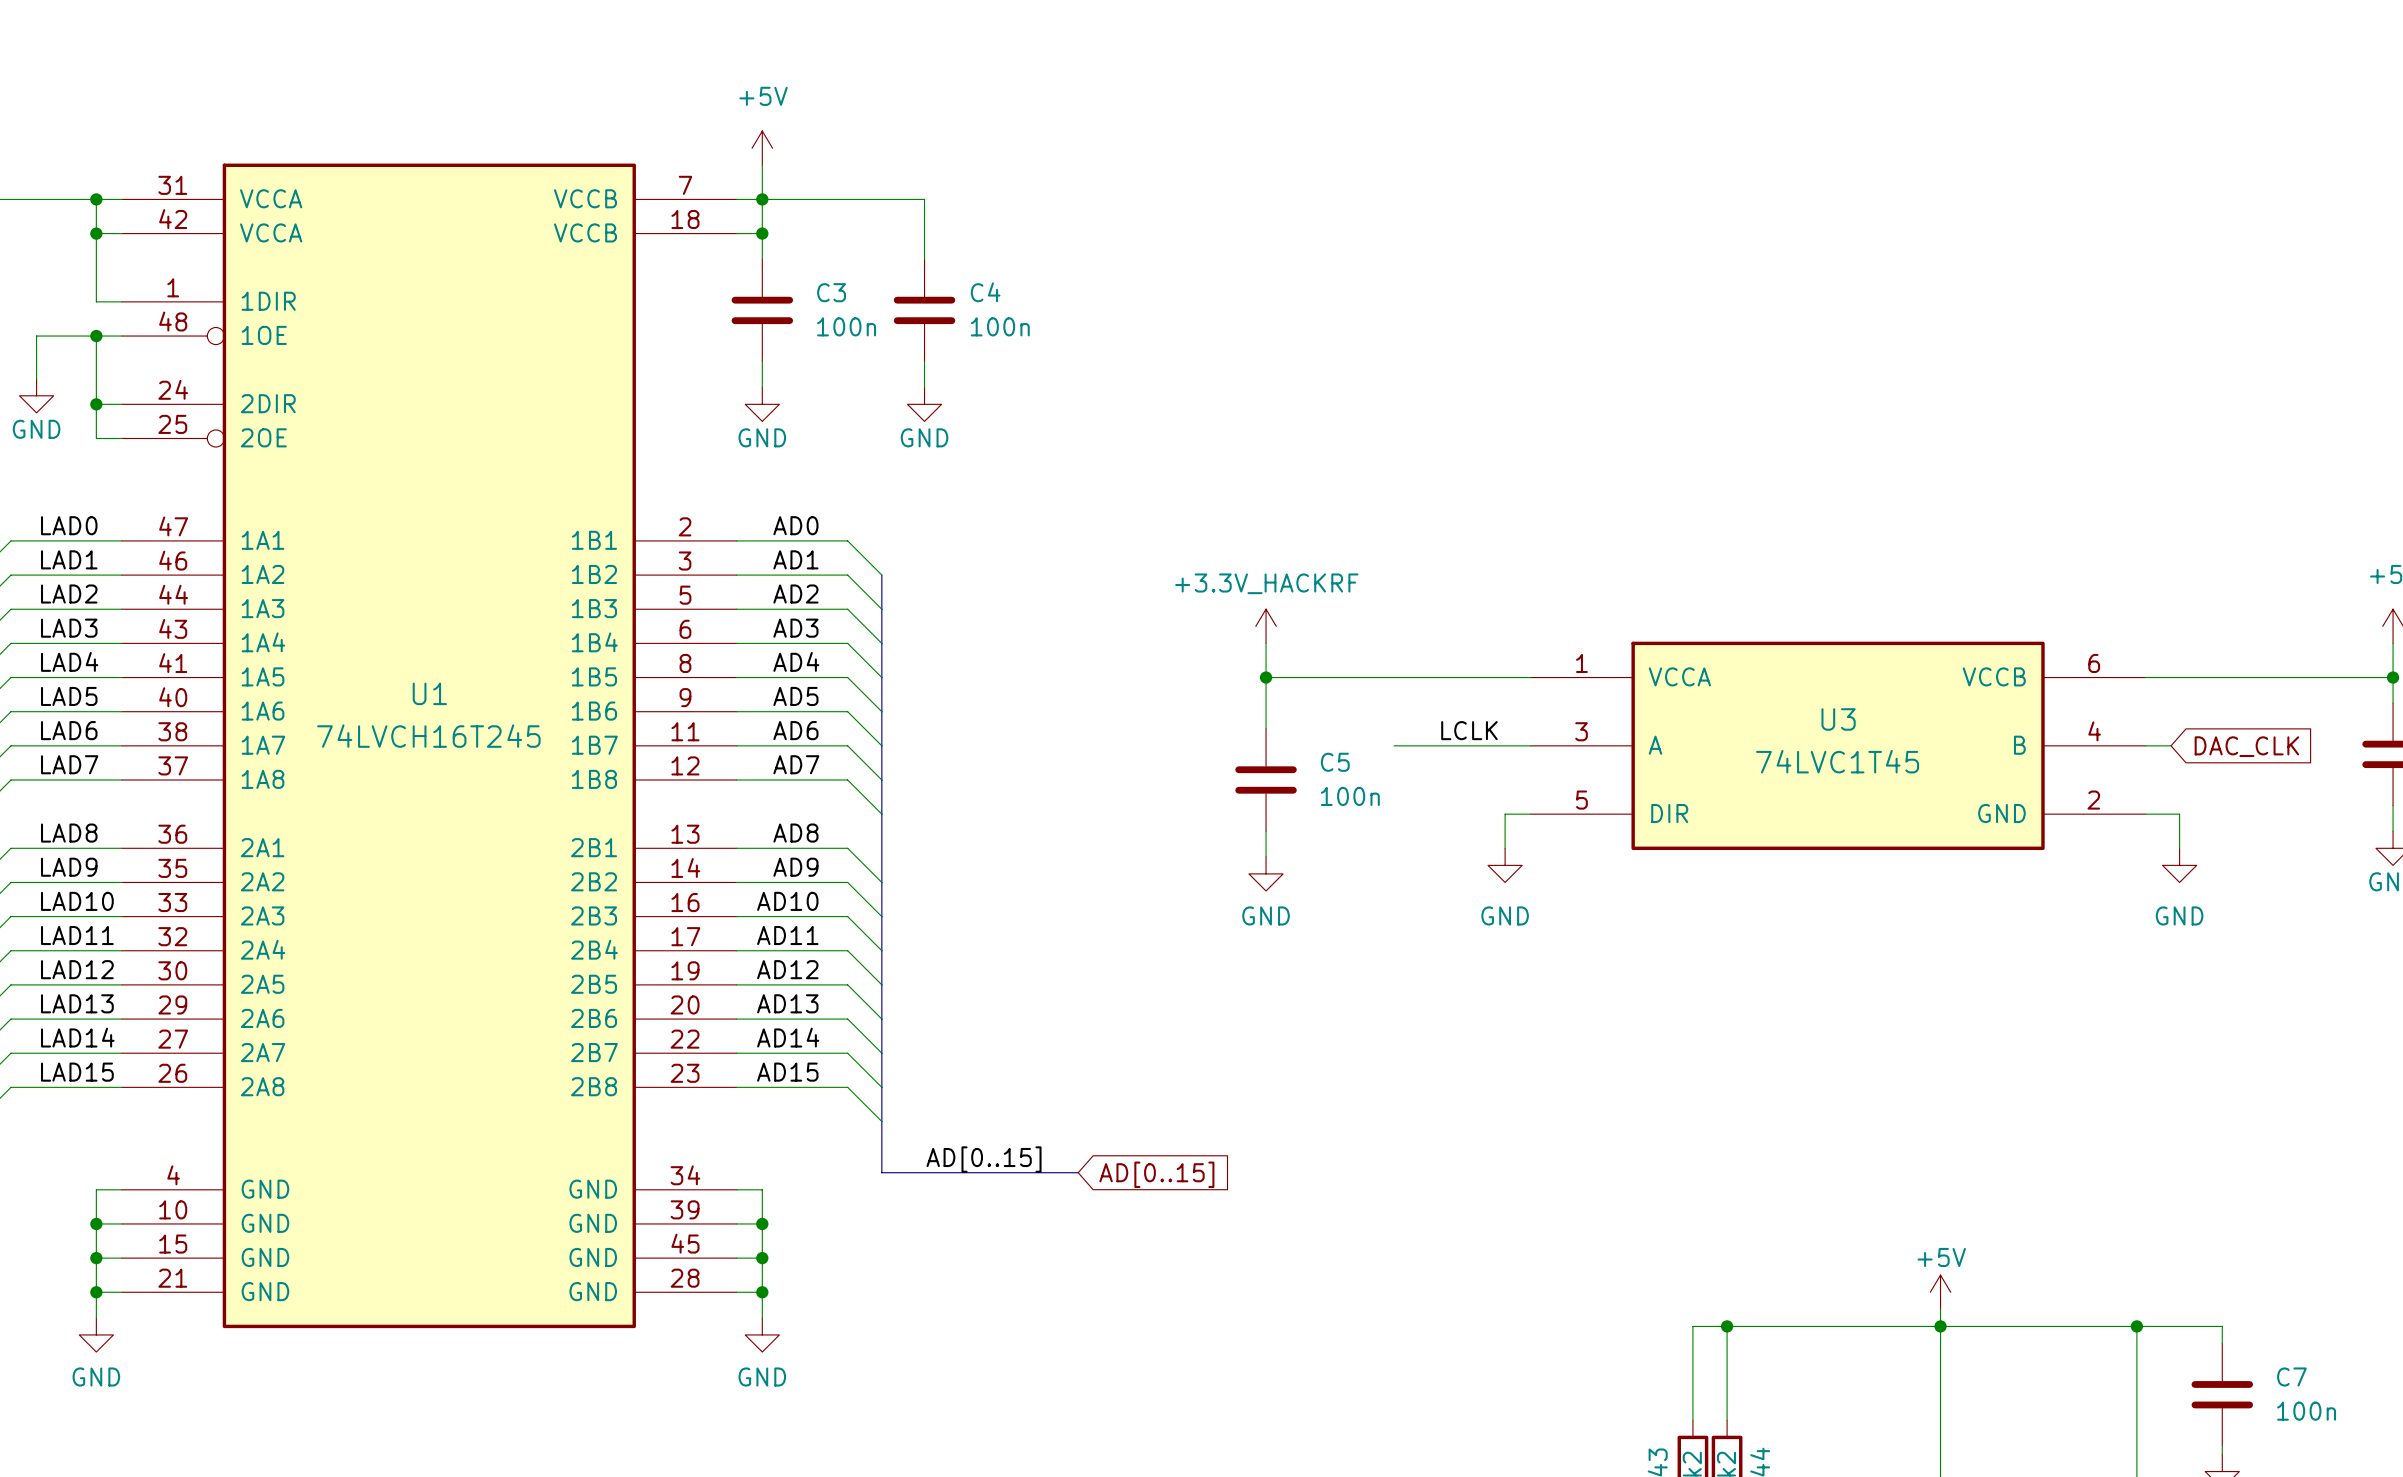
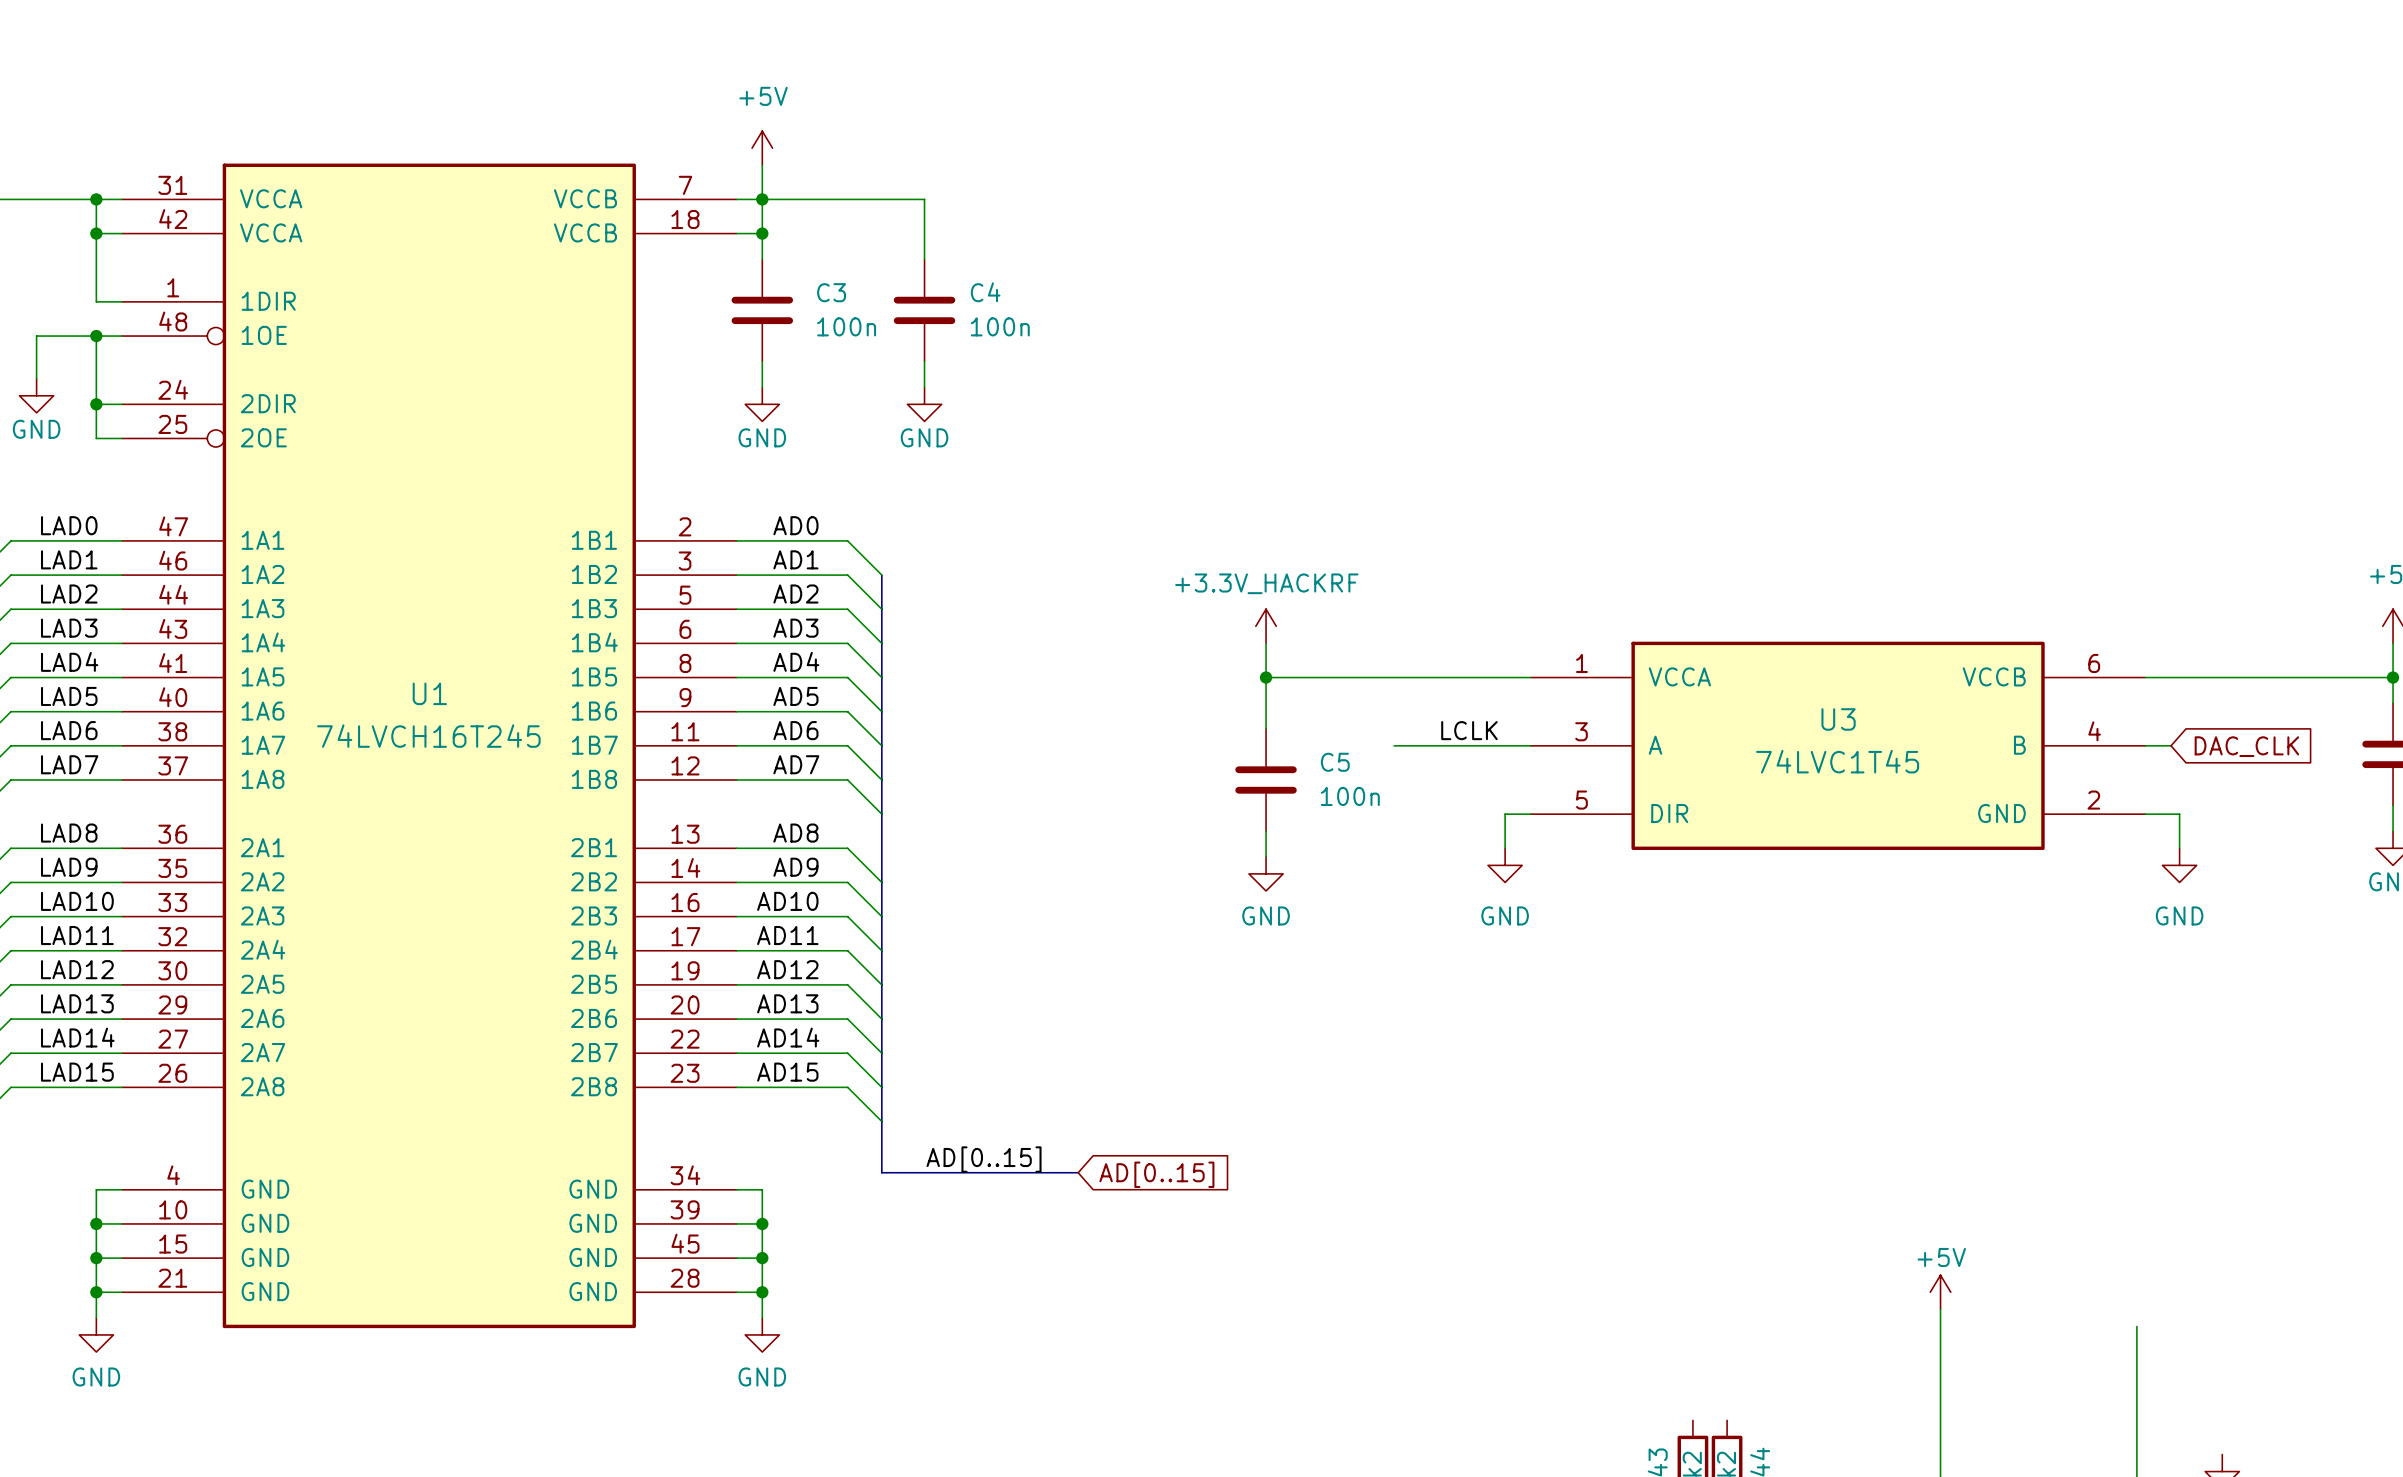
wire: (1727, 1326) (1727, 1420) -> none
junction: (1727, 1326) -> none
junction: (1940, 1326) -> none
junction: (2136, 1326) -> none
wire: (2222, 1343) (2222, 1326) (1692, 1326) (1692, 1420) -> none
C7: 100n (2222, 1394) -> none
wire: (2222, 1445) (2222, 1454) -> none

